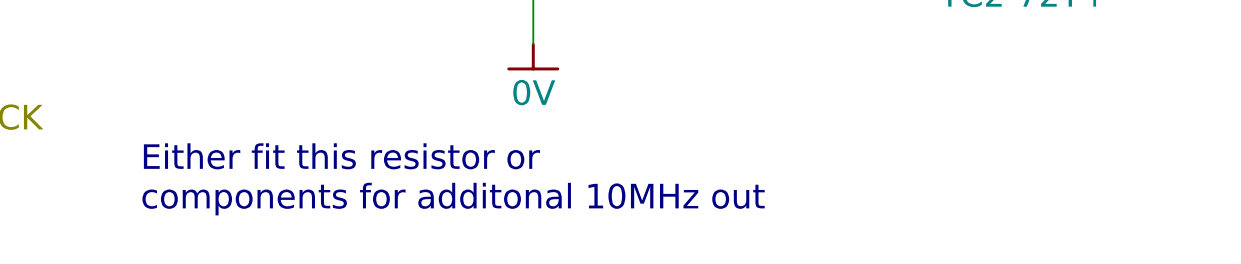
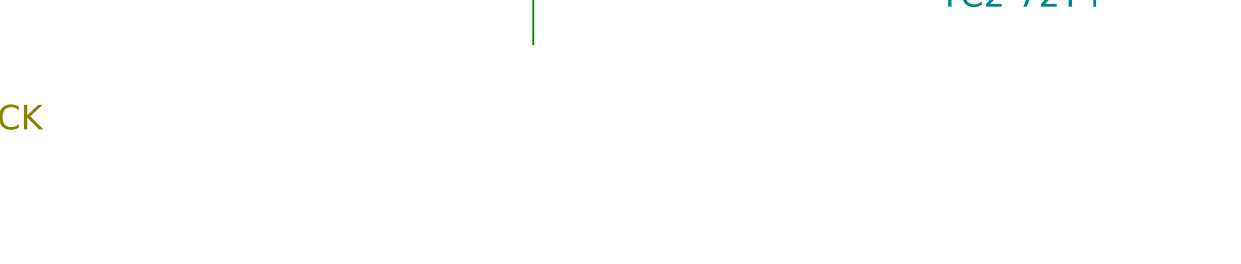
power symbol: 0V (533, 56) -> none
text: Either fit this resistor or (341, 156) -> none
text: components for additonal 10MHz out (453, 199) -> none

